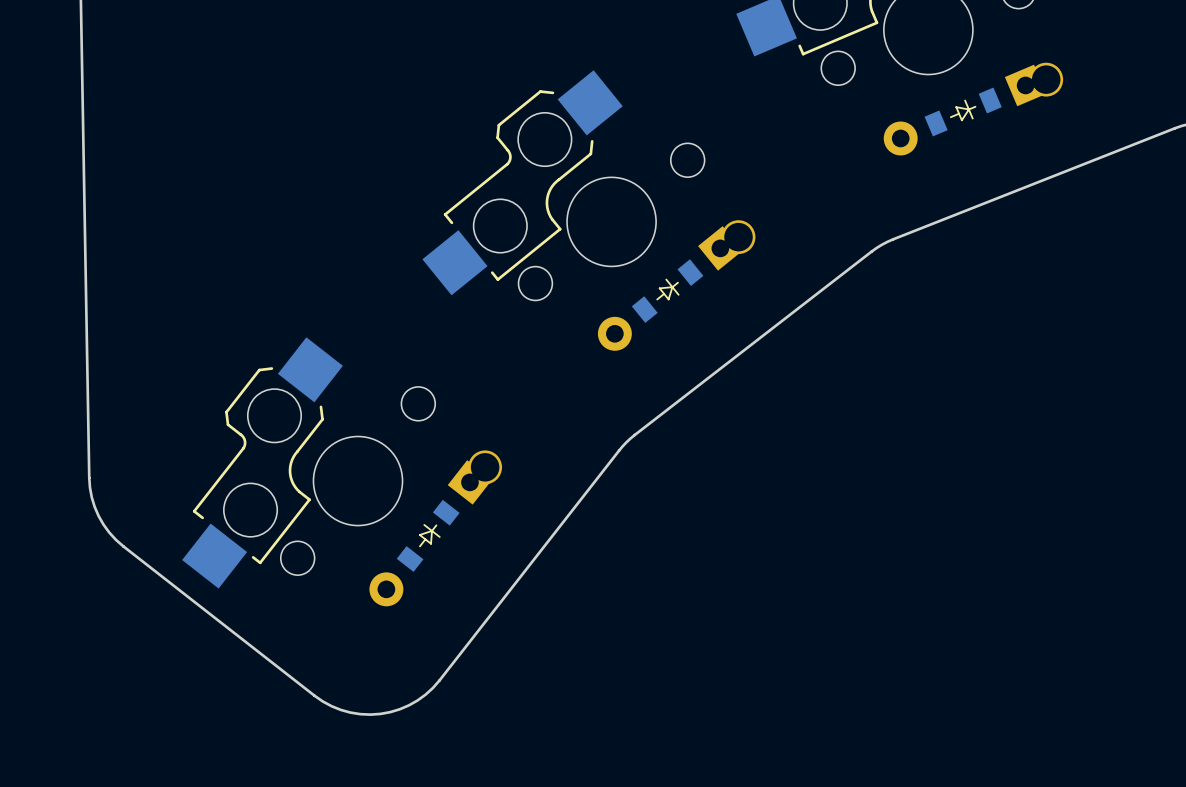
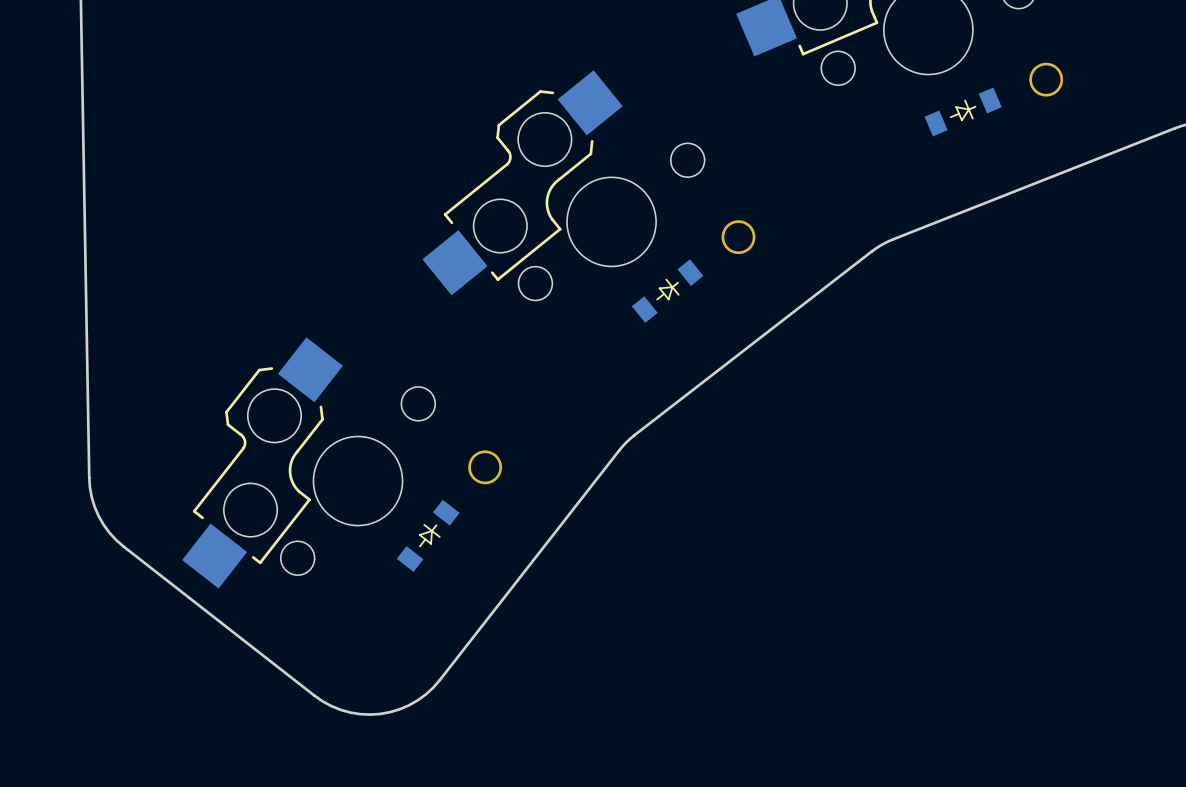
part footprint: [883, 64, 1047, 156] -> [924, 87, 1002, 137]
part footprint: [597, 226, 743, 351] -> [631, 259, 704, 323]
part footprint: [369, 460, 493, 607] -> [396, 499, 460, 572]

